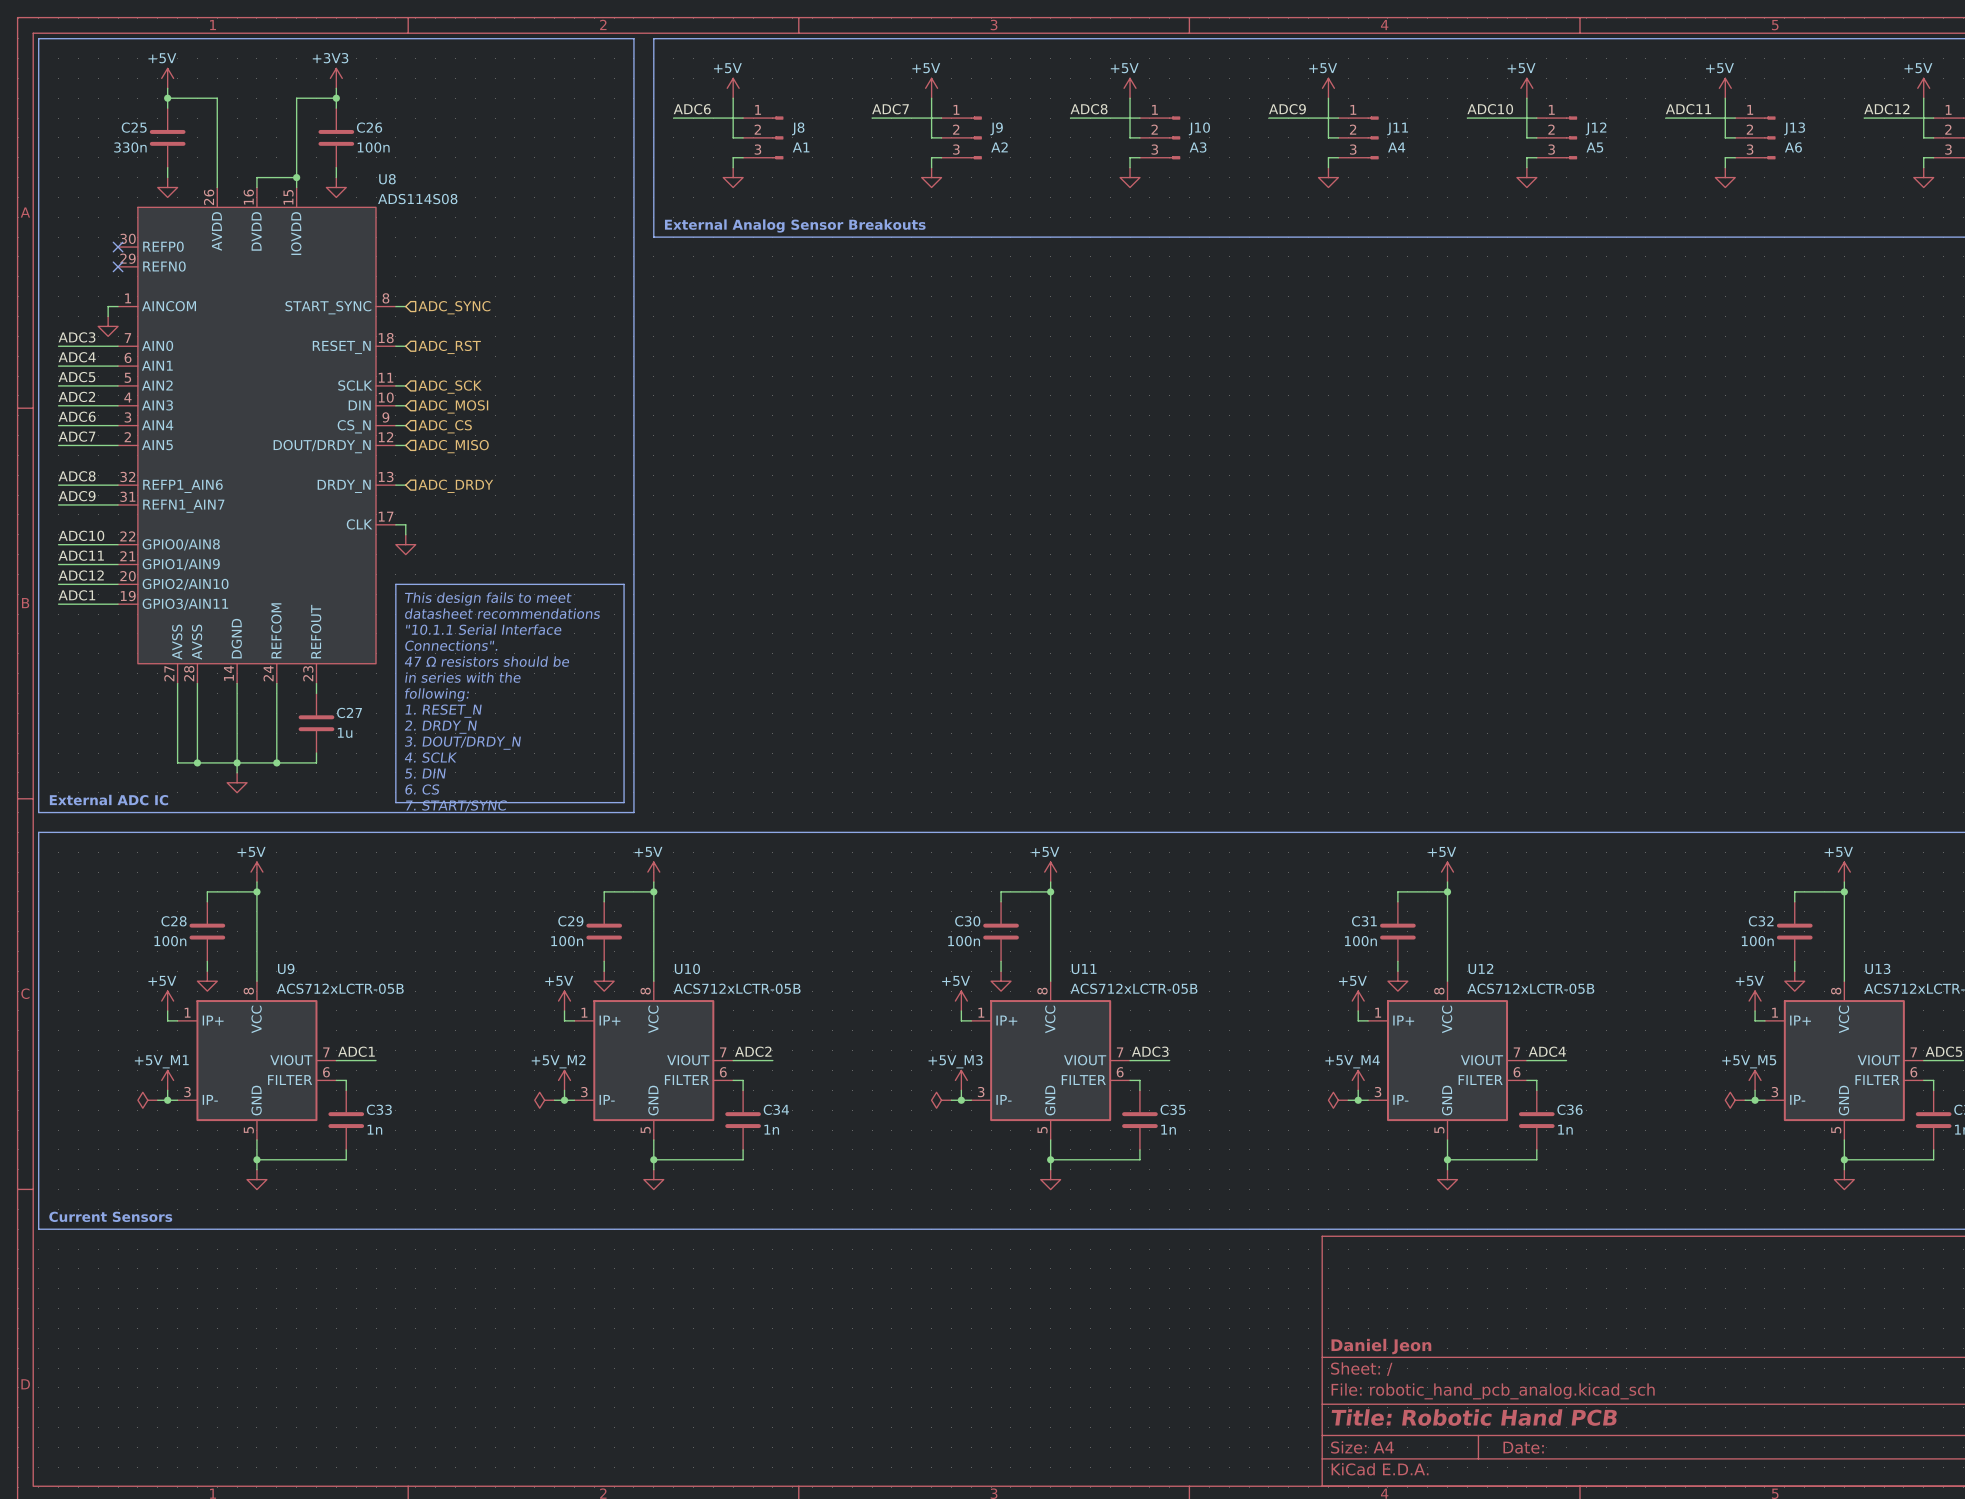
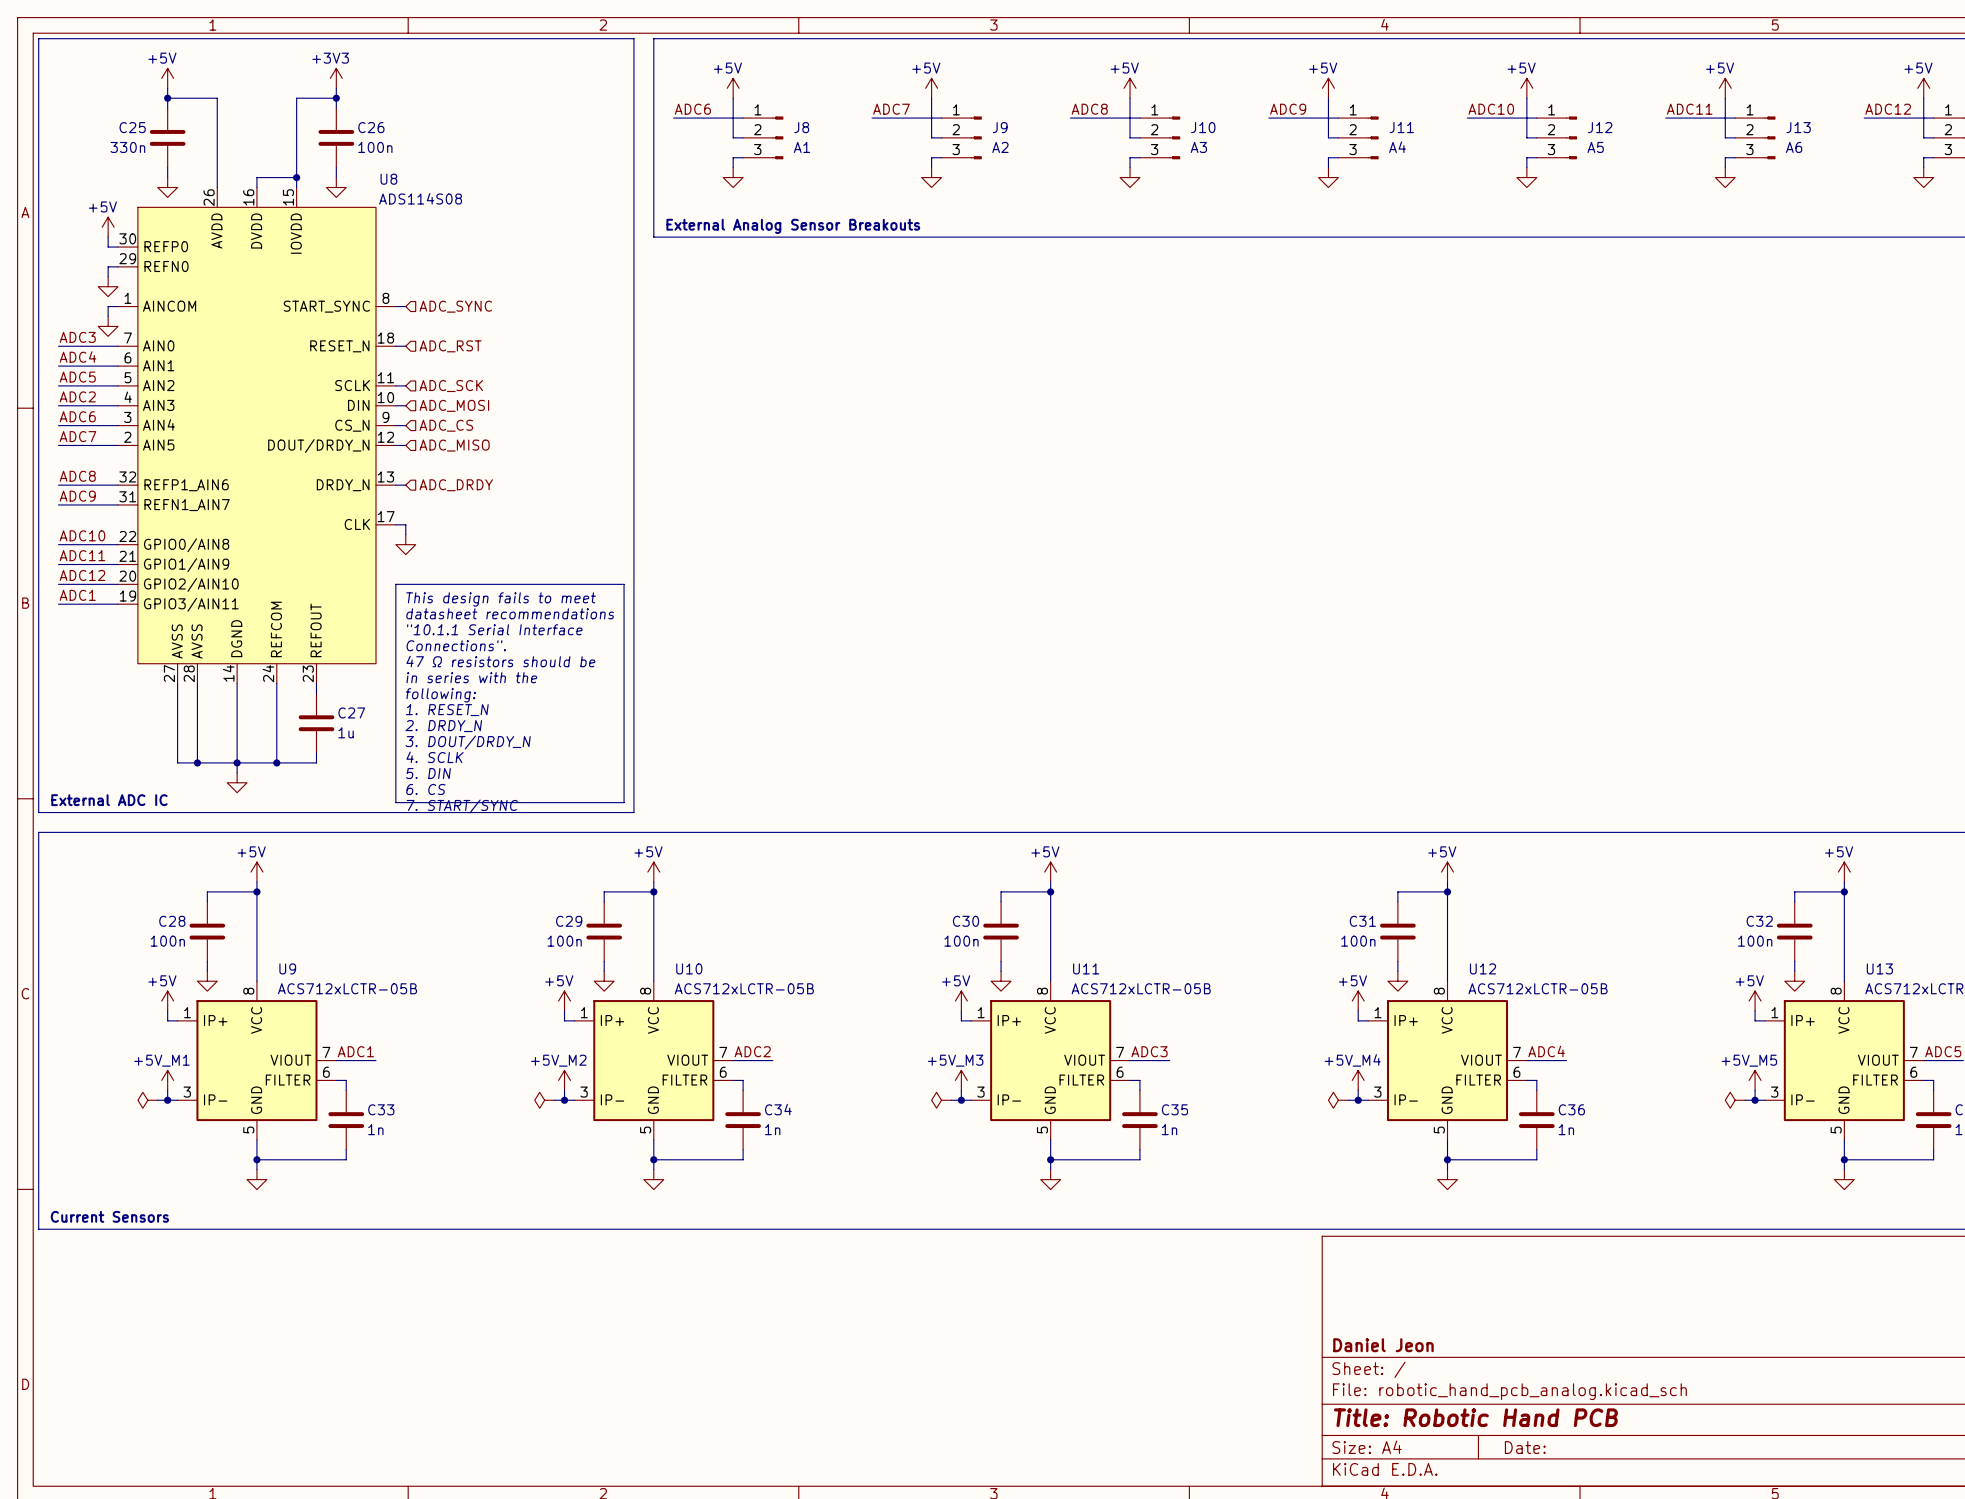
power symbol: none -> +5V (108, 227)
wire: none -> (108, 237) (108, 247) (118, 247)
no-connect mark: (118, 247) -> none
wire: none -> (118, 266) (108, 266) (108, 276)
no-connect mark: (118, 266) -> none
power symbol: none -> (108, 286)

